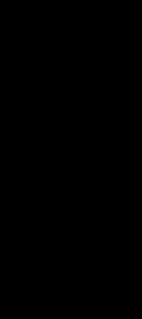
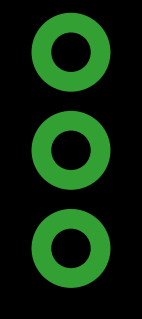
part: none -> (70, 52)
part: none -> (70, 150)
part: none -> (70, 248)

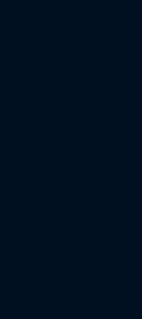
part: (70, 52) -> none
part: (70, 150) -> none
part: (70, 248) -> none

